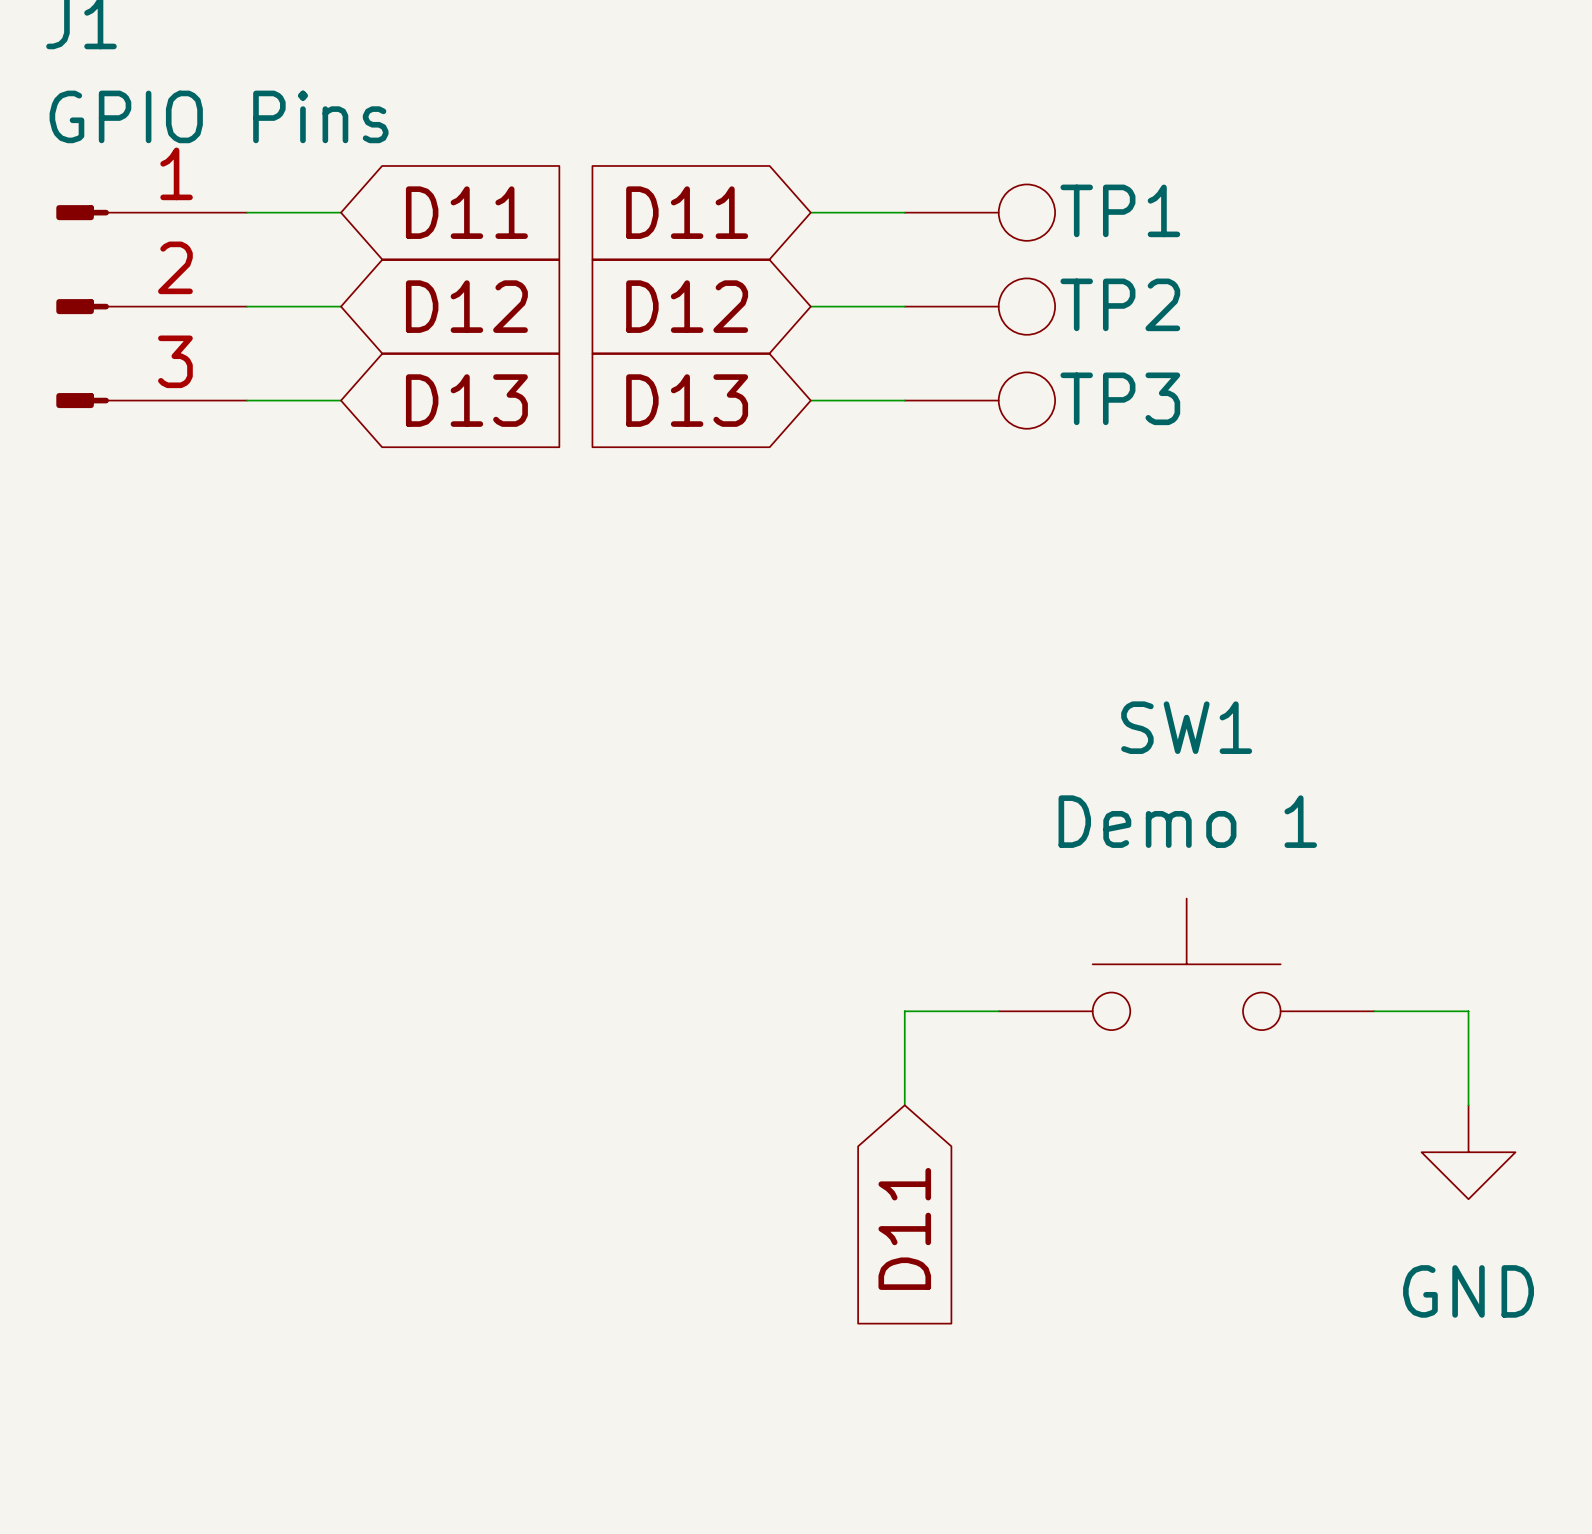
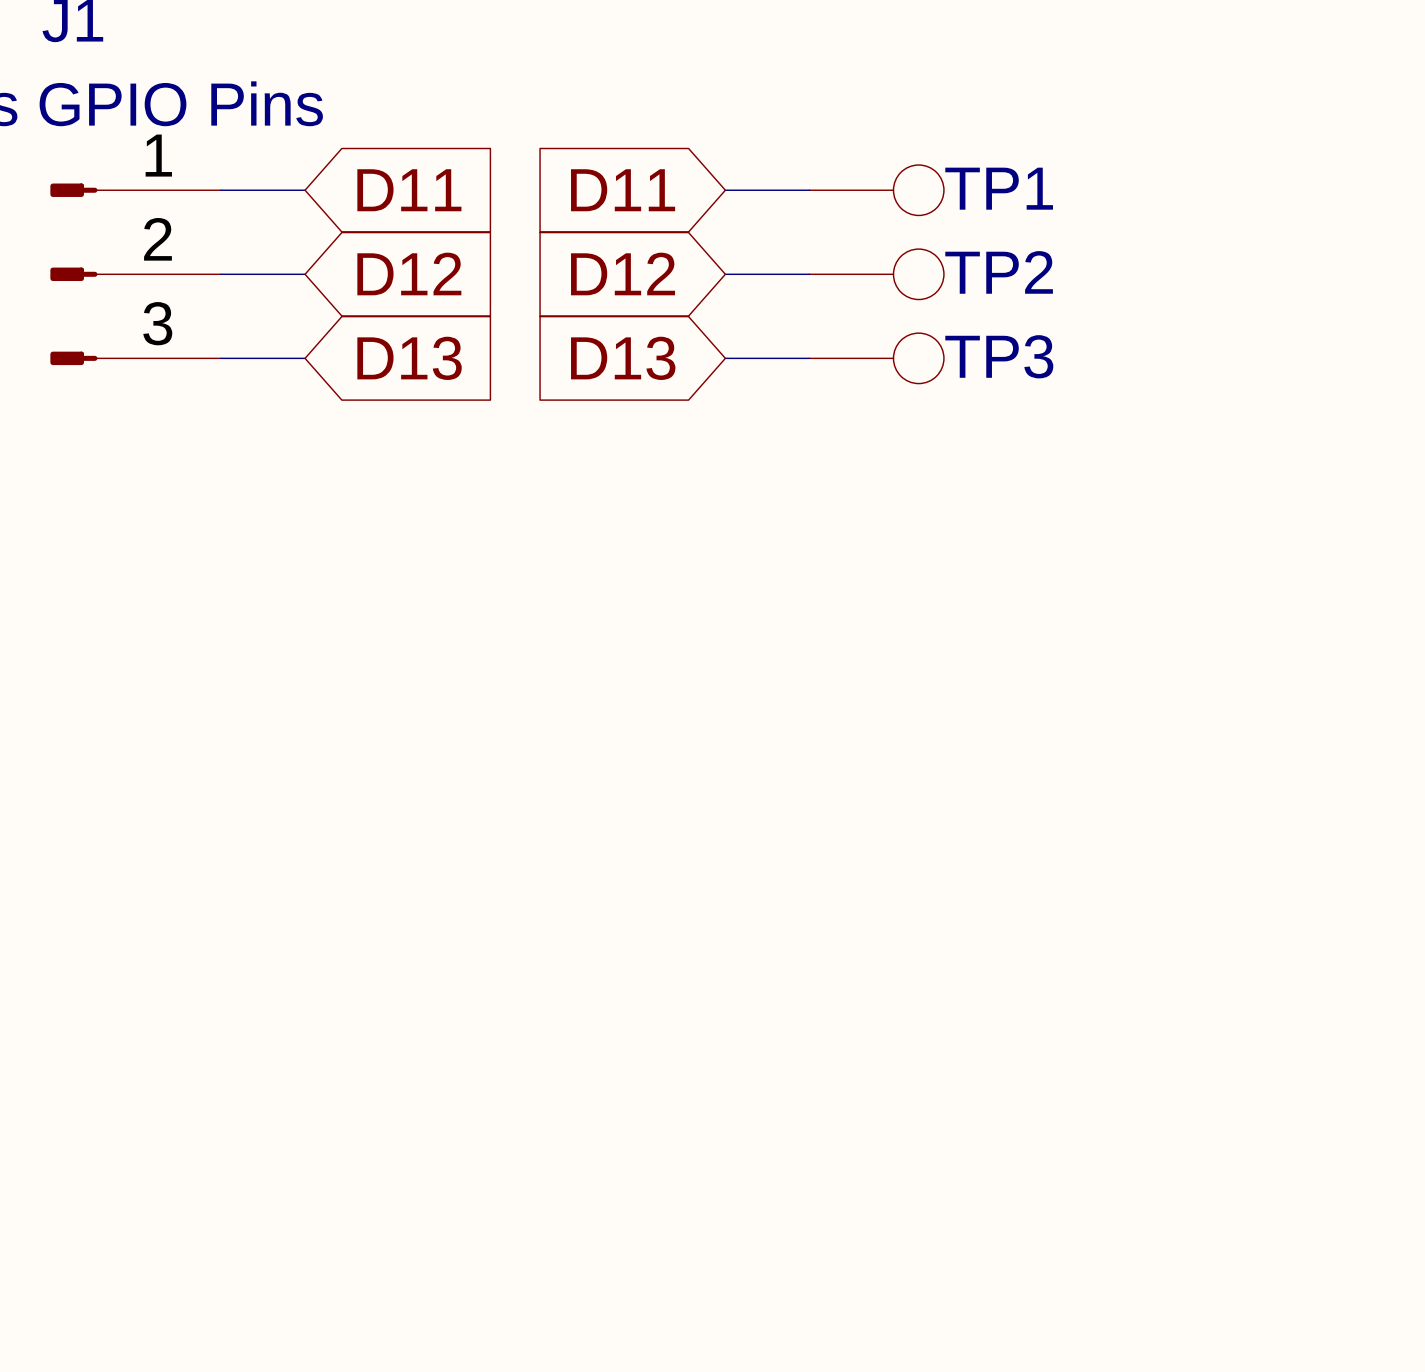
SW1: Demo 1 (1186, 964) -> none
wire: (998, 1011) (904, 1011) (904, 1105) -> none
wire: (1374, 1011) (1468, 1011) (1468, 1105) -> none
power symbol: GND (1468, 1152) -> none
global label: D11 (904, 1228) -> none

